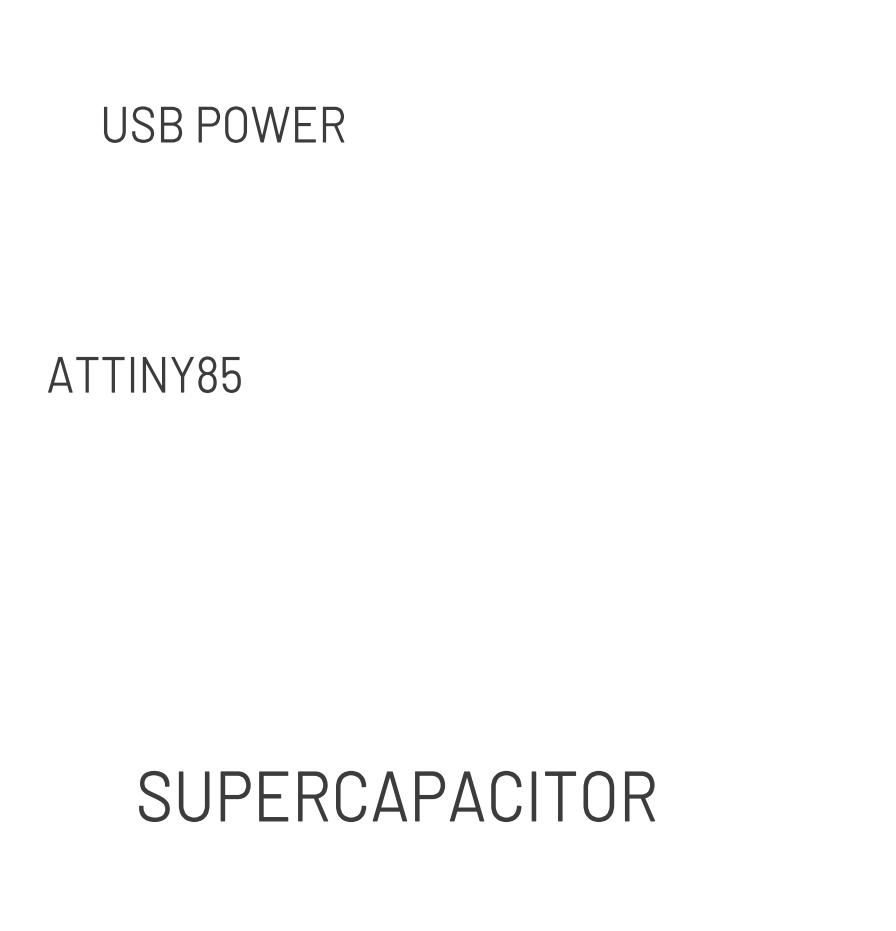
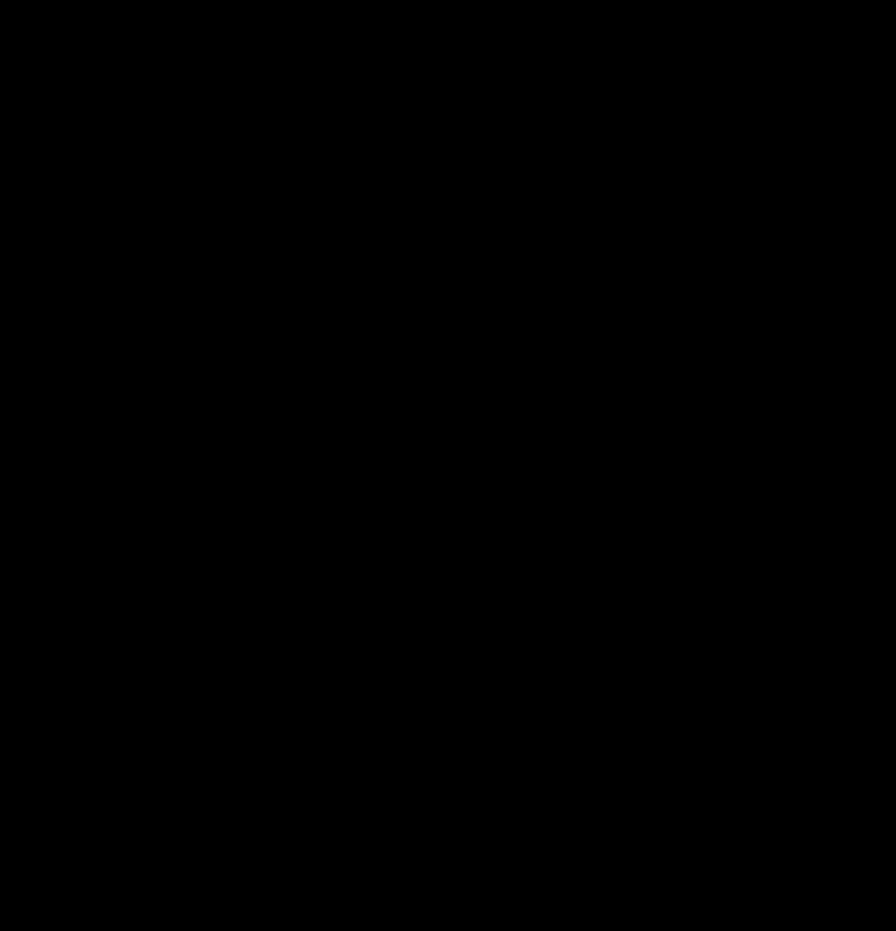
text: USB POWER (224, 124) -> none
text: ATTINY85 (144, 374) -> none
text: SUPERCAPACITOR (397, 796) -> none

